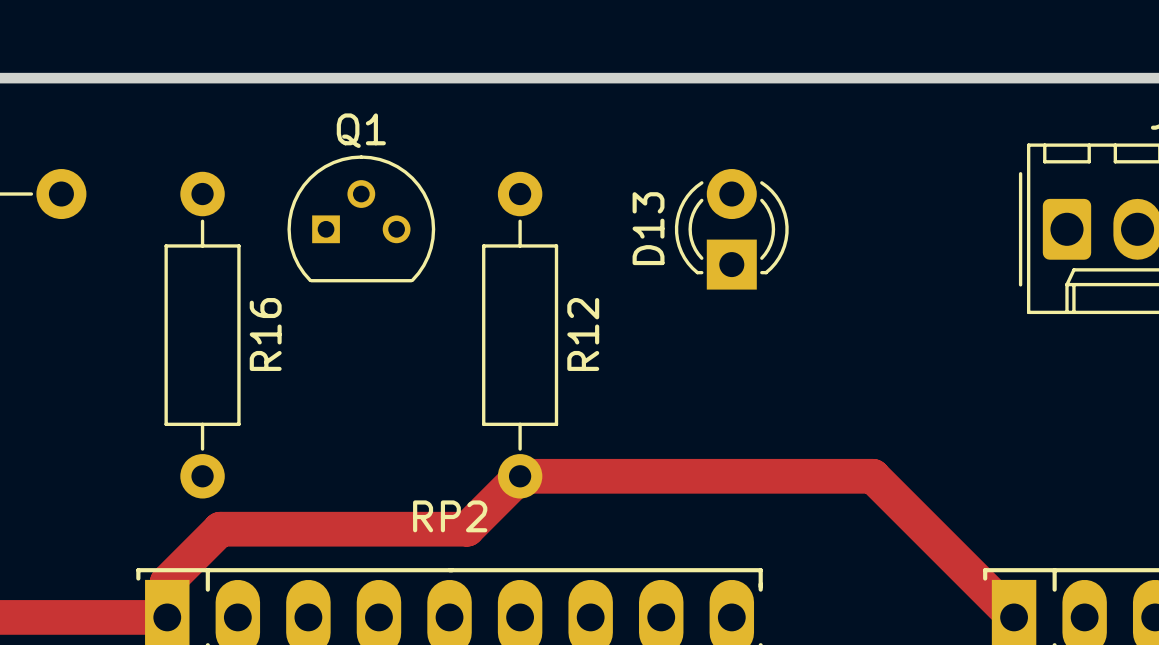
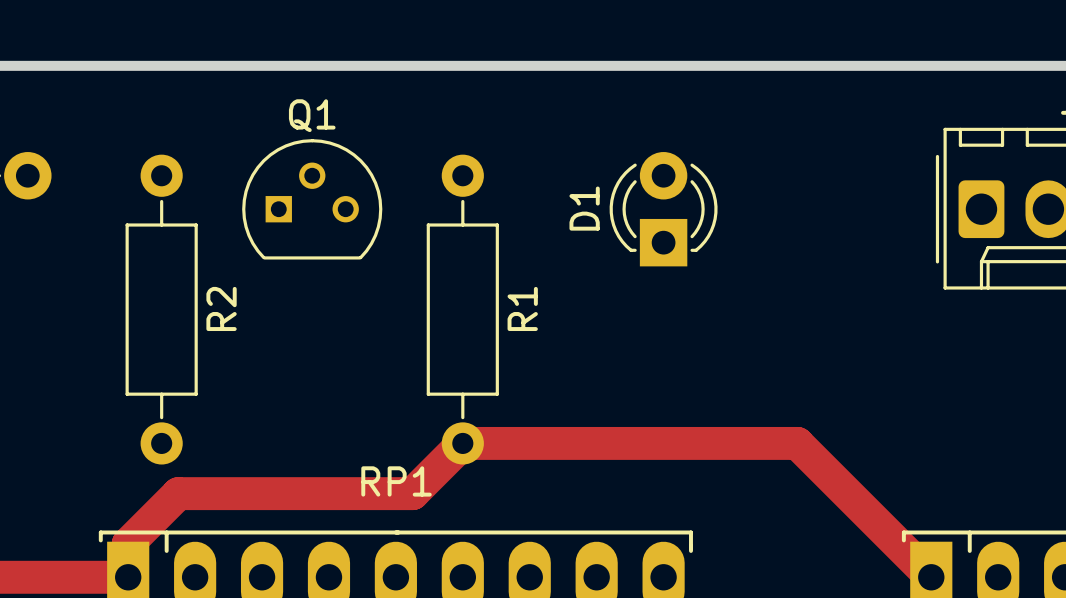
D13 name: D13 (648, 228) -> D1 (584, 208)
R16 name: R16 (265, 334) -> R2 (221, 308)
R12 name: R12 (583, 334) -> R1 (522, 308)
RP2 name: RP2 (450, 516) -> RP1 (396, 481)

